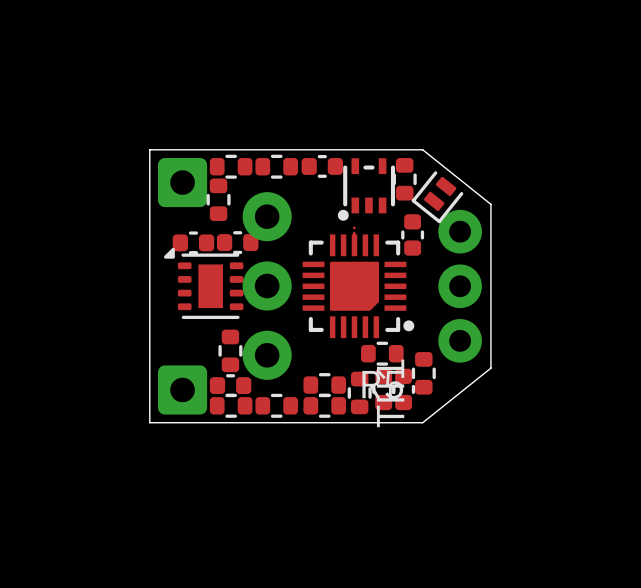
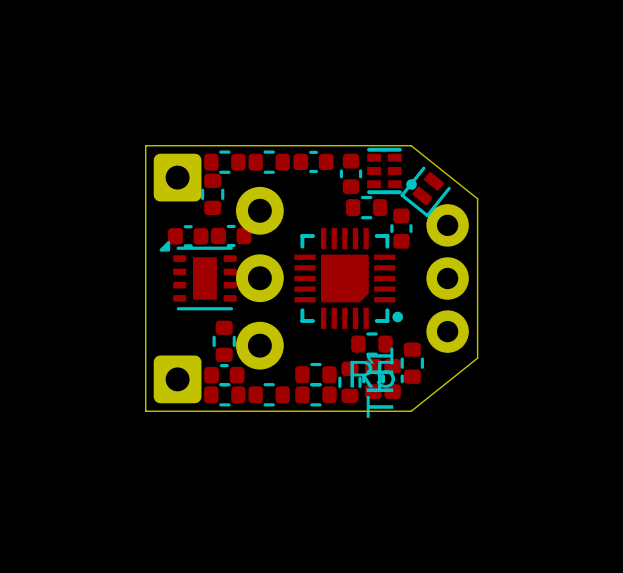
part footprint: [392, 157, 417, 201] -> [367, 147, 417, 195]
part footprint: [337, 158, 396, 221] -> [339, 153, 363, 195]
part: none -> (366, 207)
part: (354, 230) -> none

